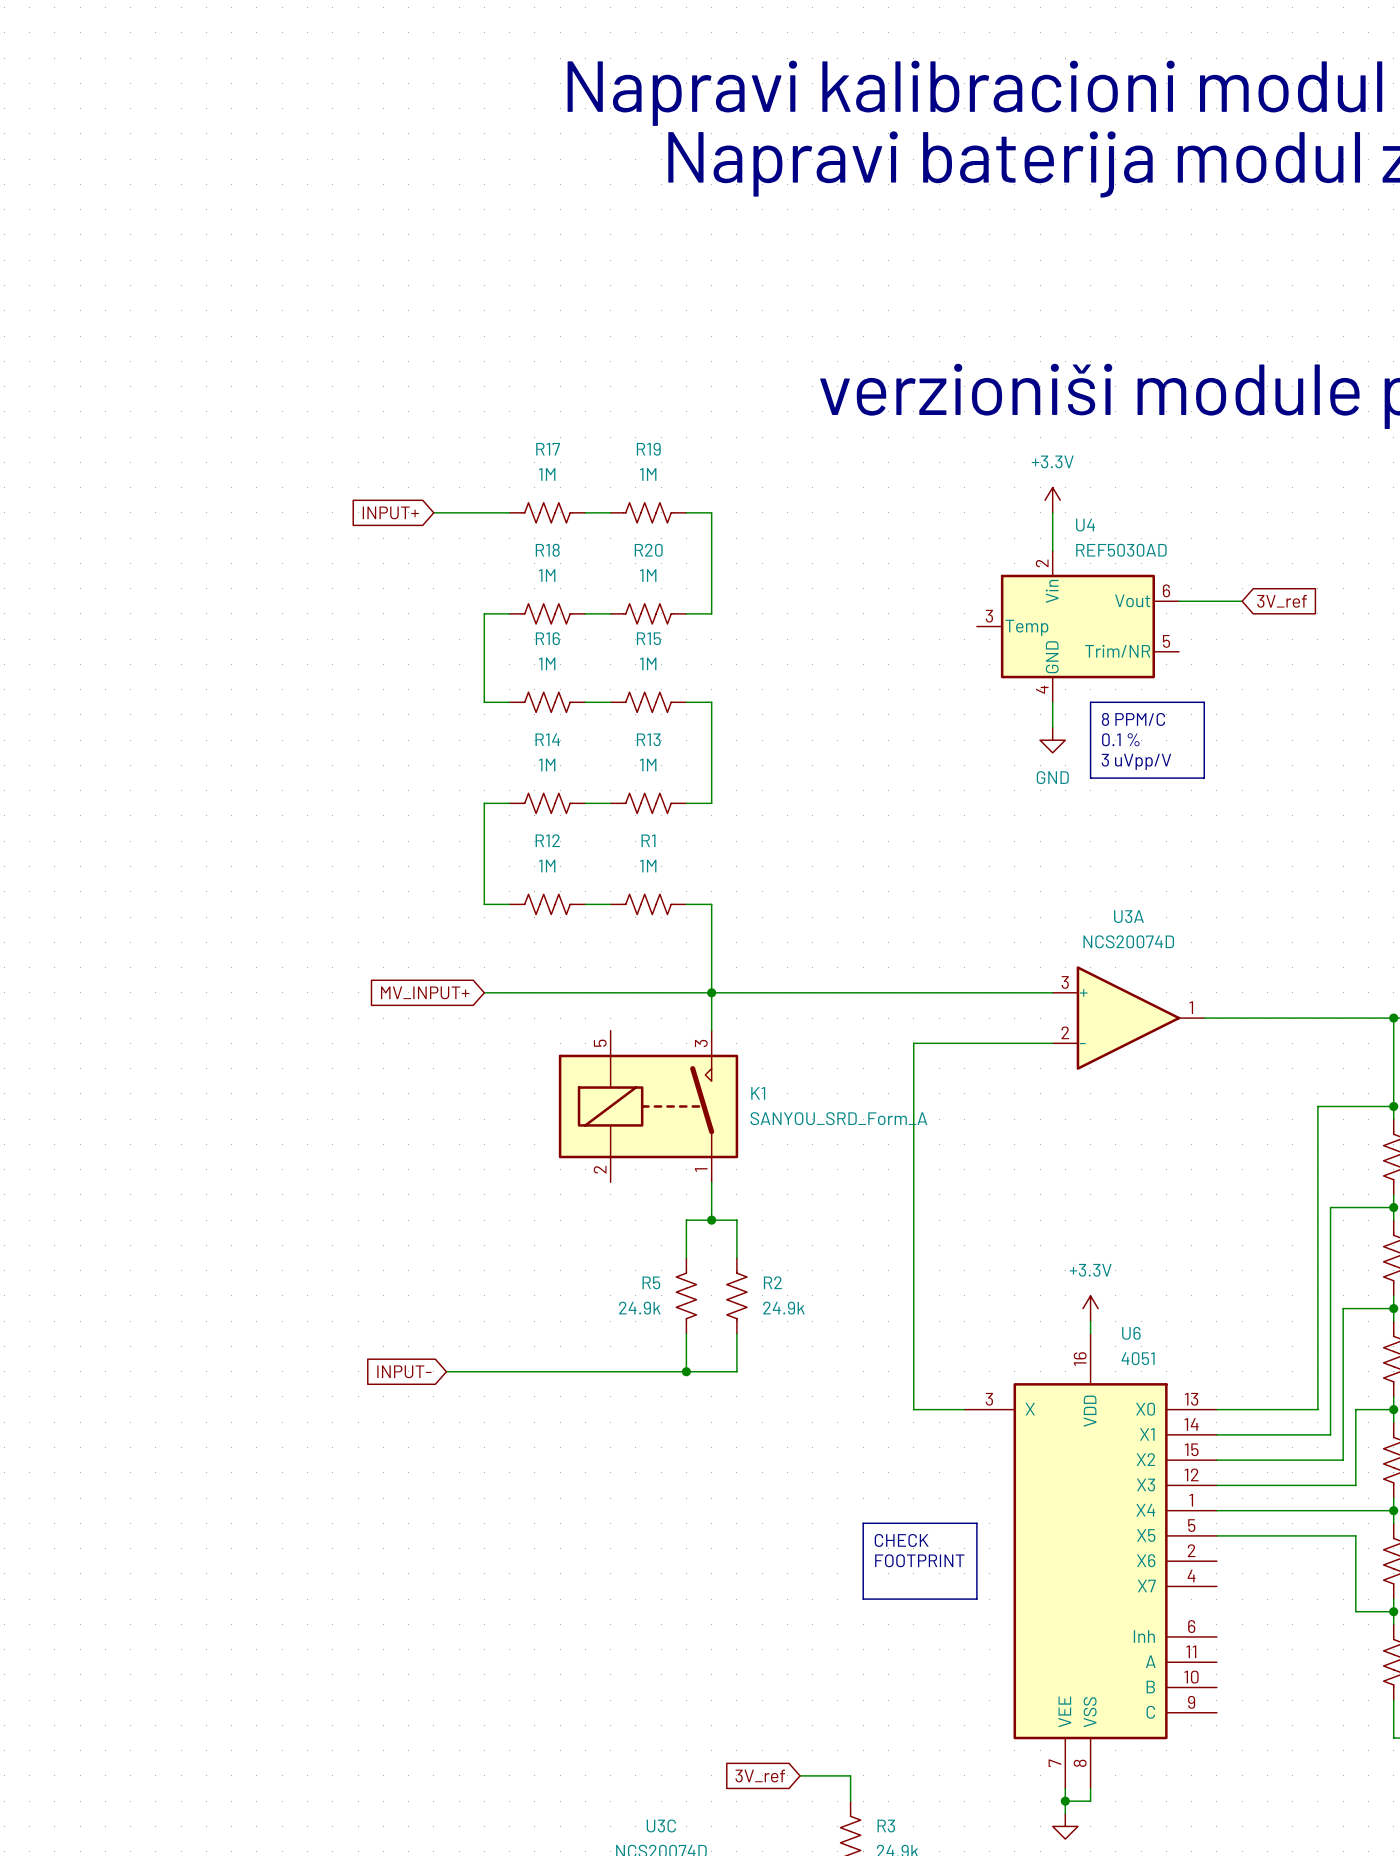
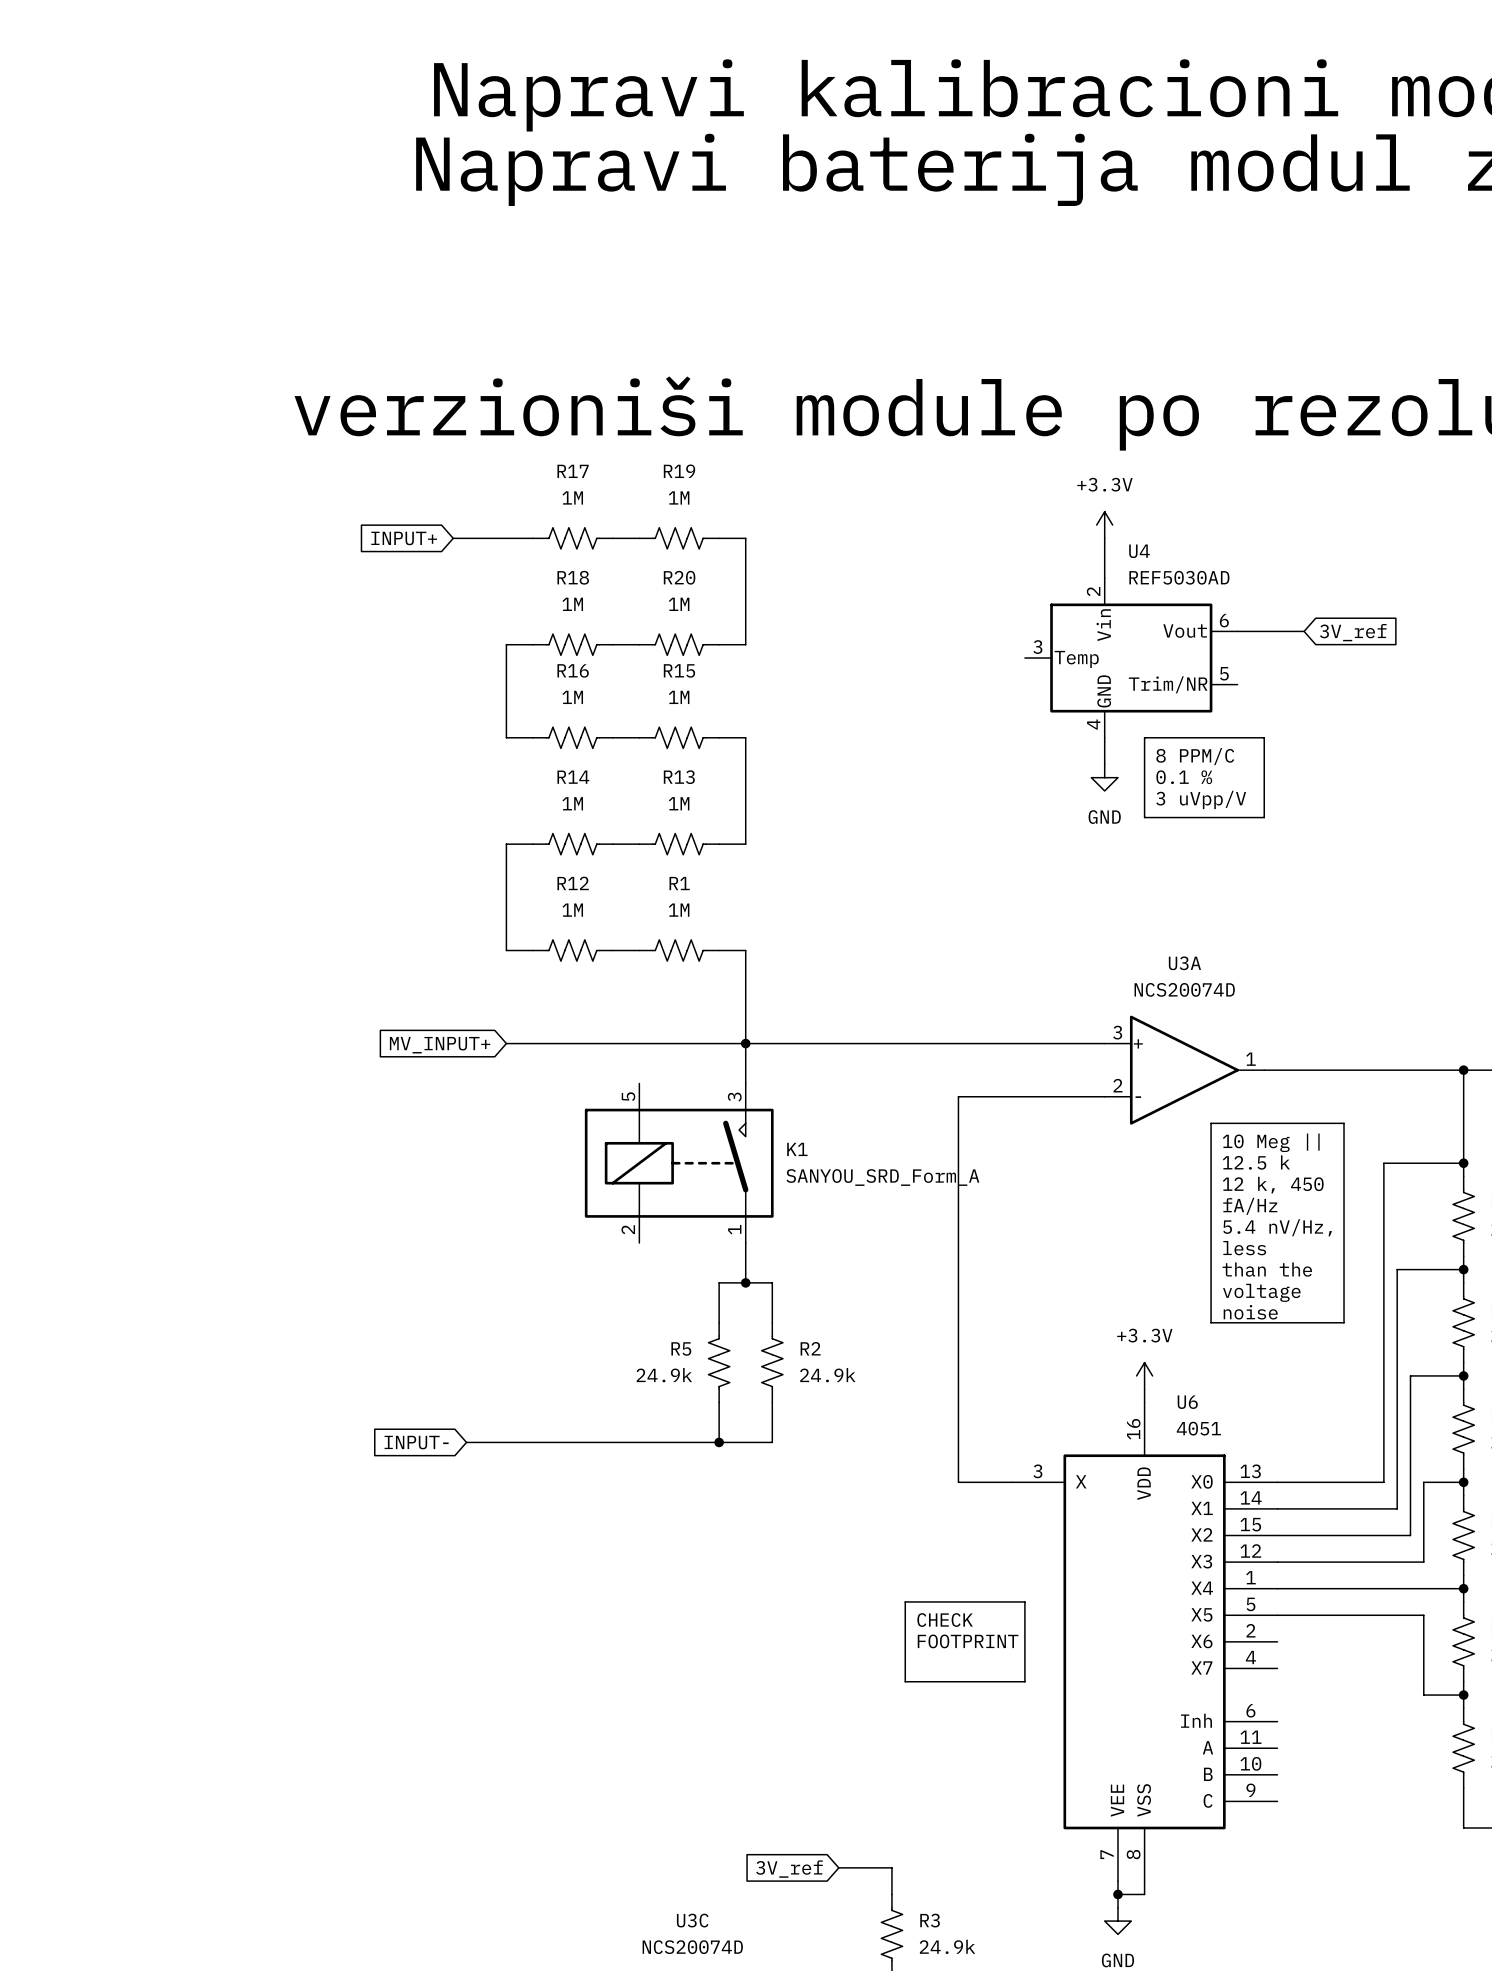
line: none -> (1211, 1123) (1344, 1123) (1344, 1322) (1211, 1322) (1211, 1123)
text: none -> 10 Meg || (1271, 1142)
text: none -> 12.5 k (1256, 1162)
text: none -> 12 k, 450 (1273, 1185)
text: none -> fA/Hz (1250, 1206)
text: none -> 5.4 nV/Hz, (1277, 1227)
text: none -> less (1244, 1248)
text: none -> than the (1267, 1269)
text: none -> voltage (1261, 1292)
text: none -> noise (1250, 1312)

